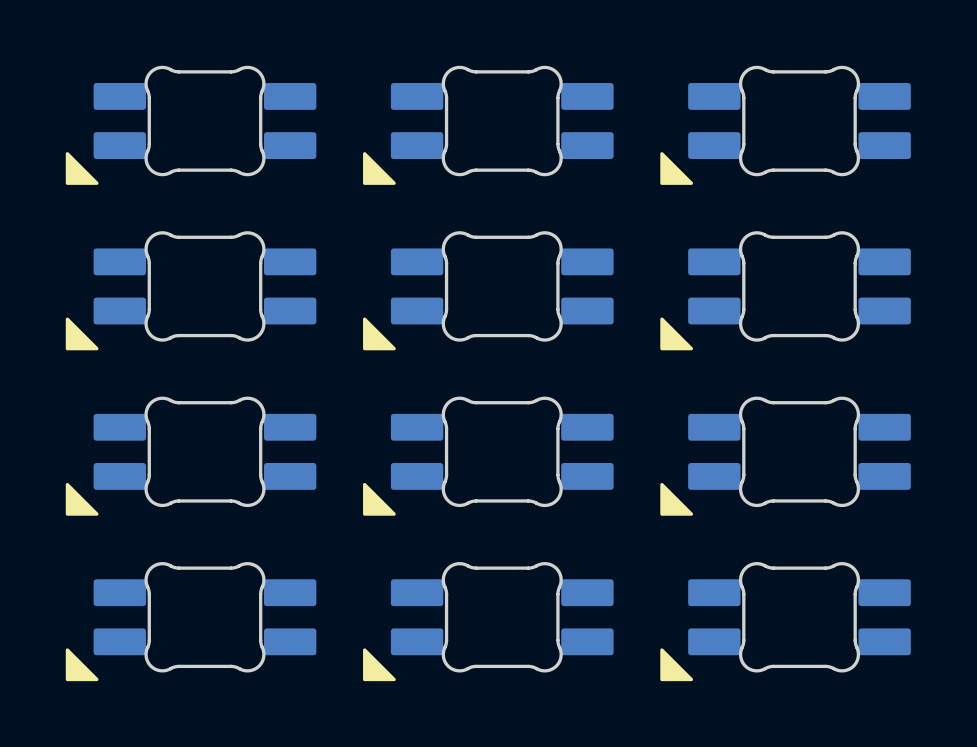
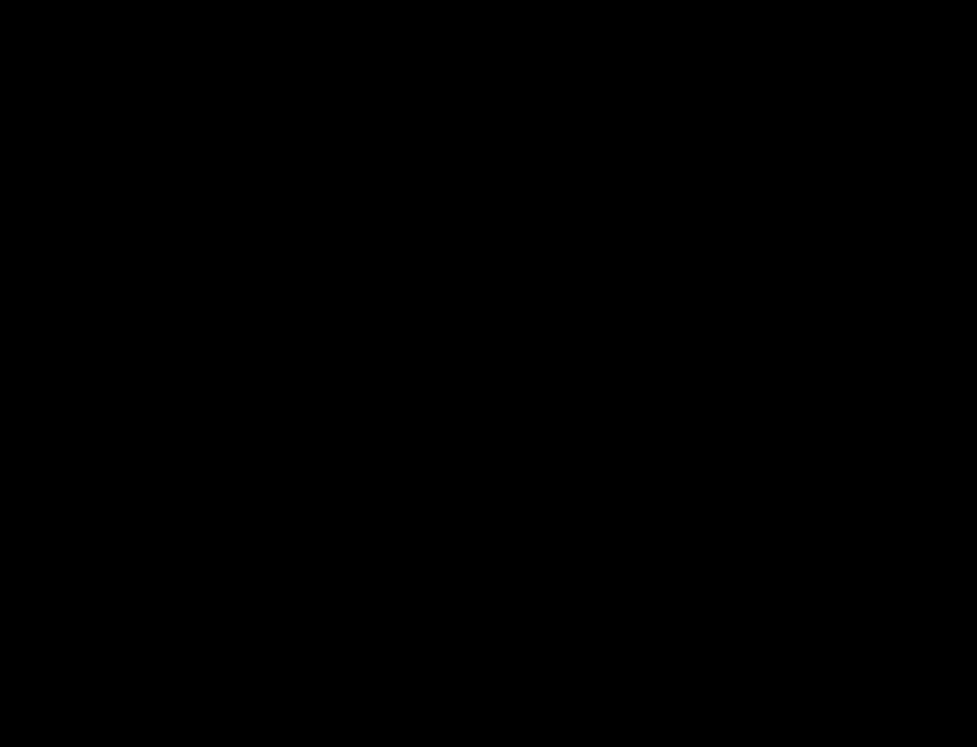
part: (191, 125) -> none
part: (488, 125) -> none
part: (785, 125) -> none
part: (191, 290) -> none
part: (488, 290) -> none
part: (785, 290) -> none
part: (191, 456) -> none
part: (488, 456) -> none
part: (785, 456) -> none
part: (191, 621) -> none
part: (488, 621) -> none
part: (785, 621) -> none

